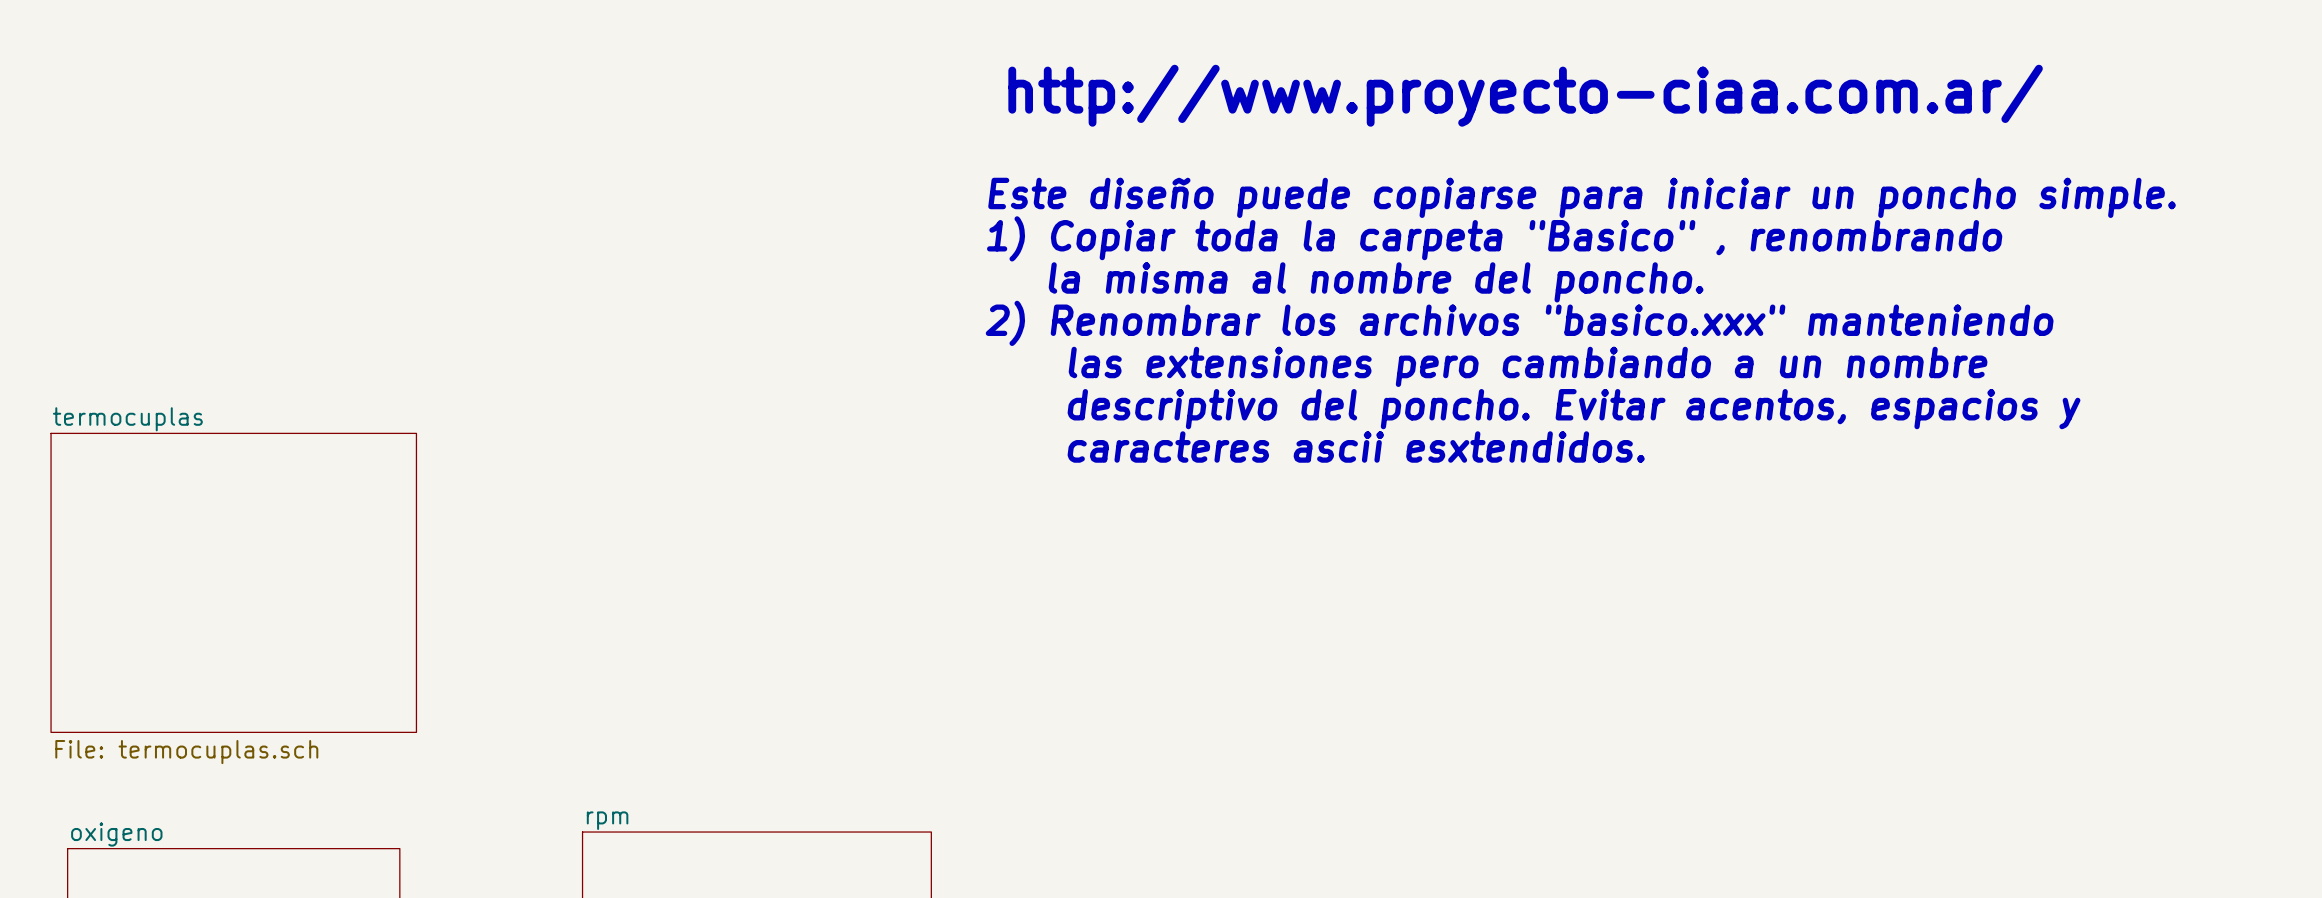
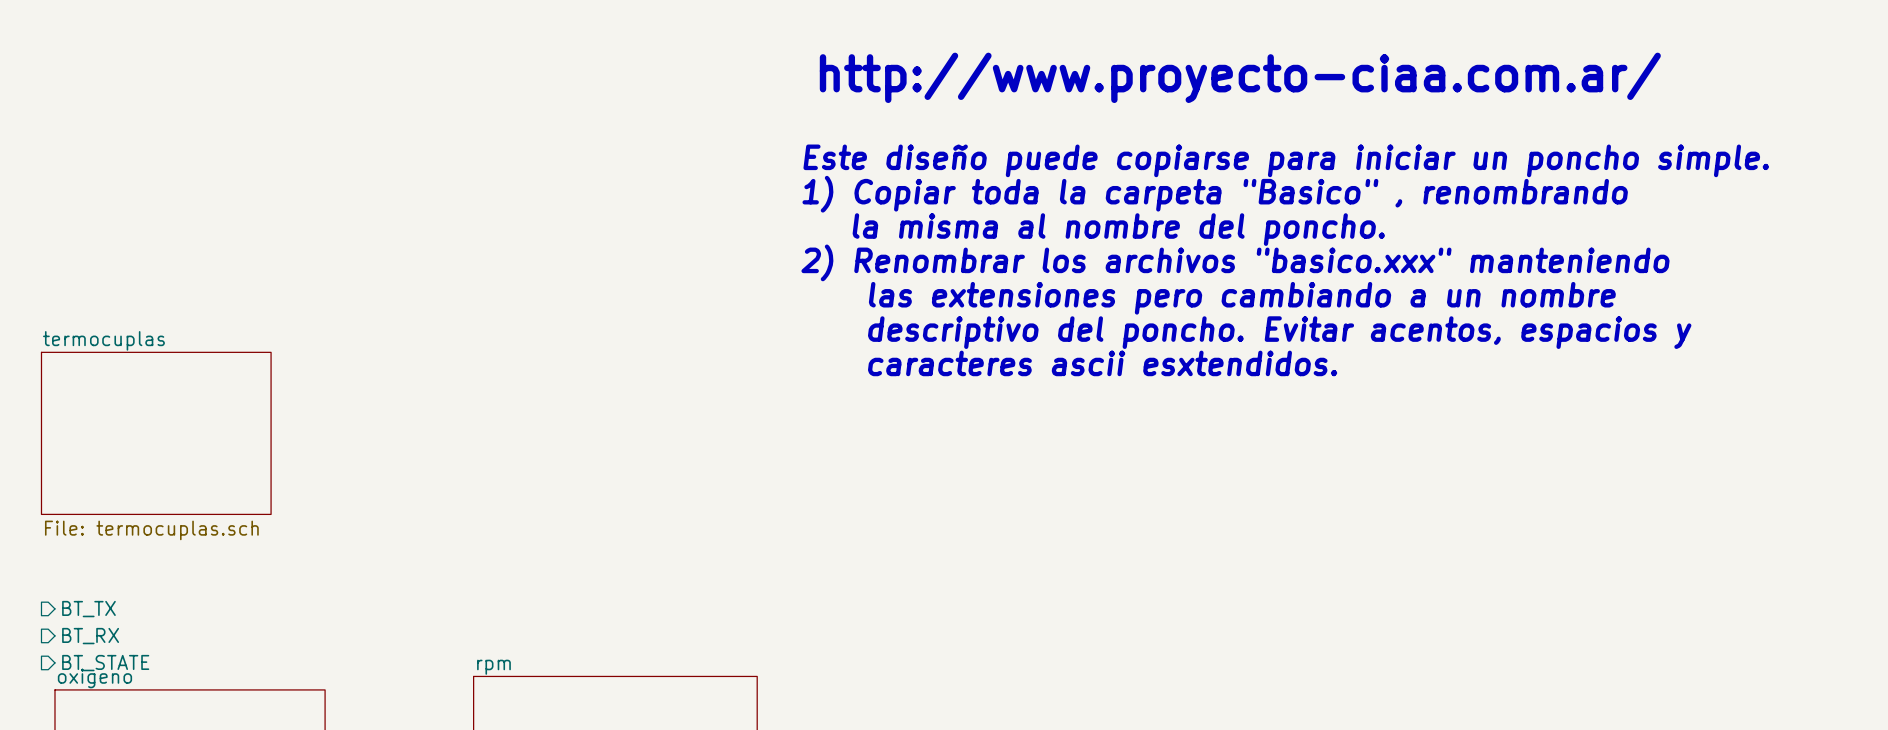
sheet termocuplas: none -> File: termocuplas.sch (156, 433)
sheet termocuplas: File: termocuplas.sch (233, 582) -> none
sheet pin: none -> BT_TX (88, 609)
sheet pin: none -> BT_RX (90, 636)
sheet pin: none -> BT_STATE (105, 663)

